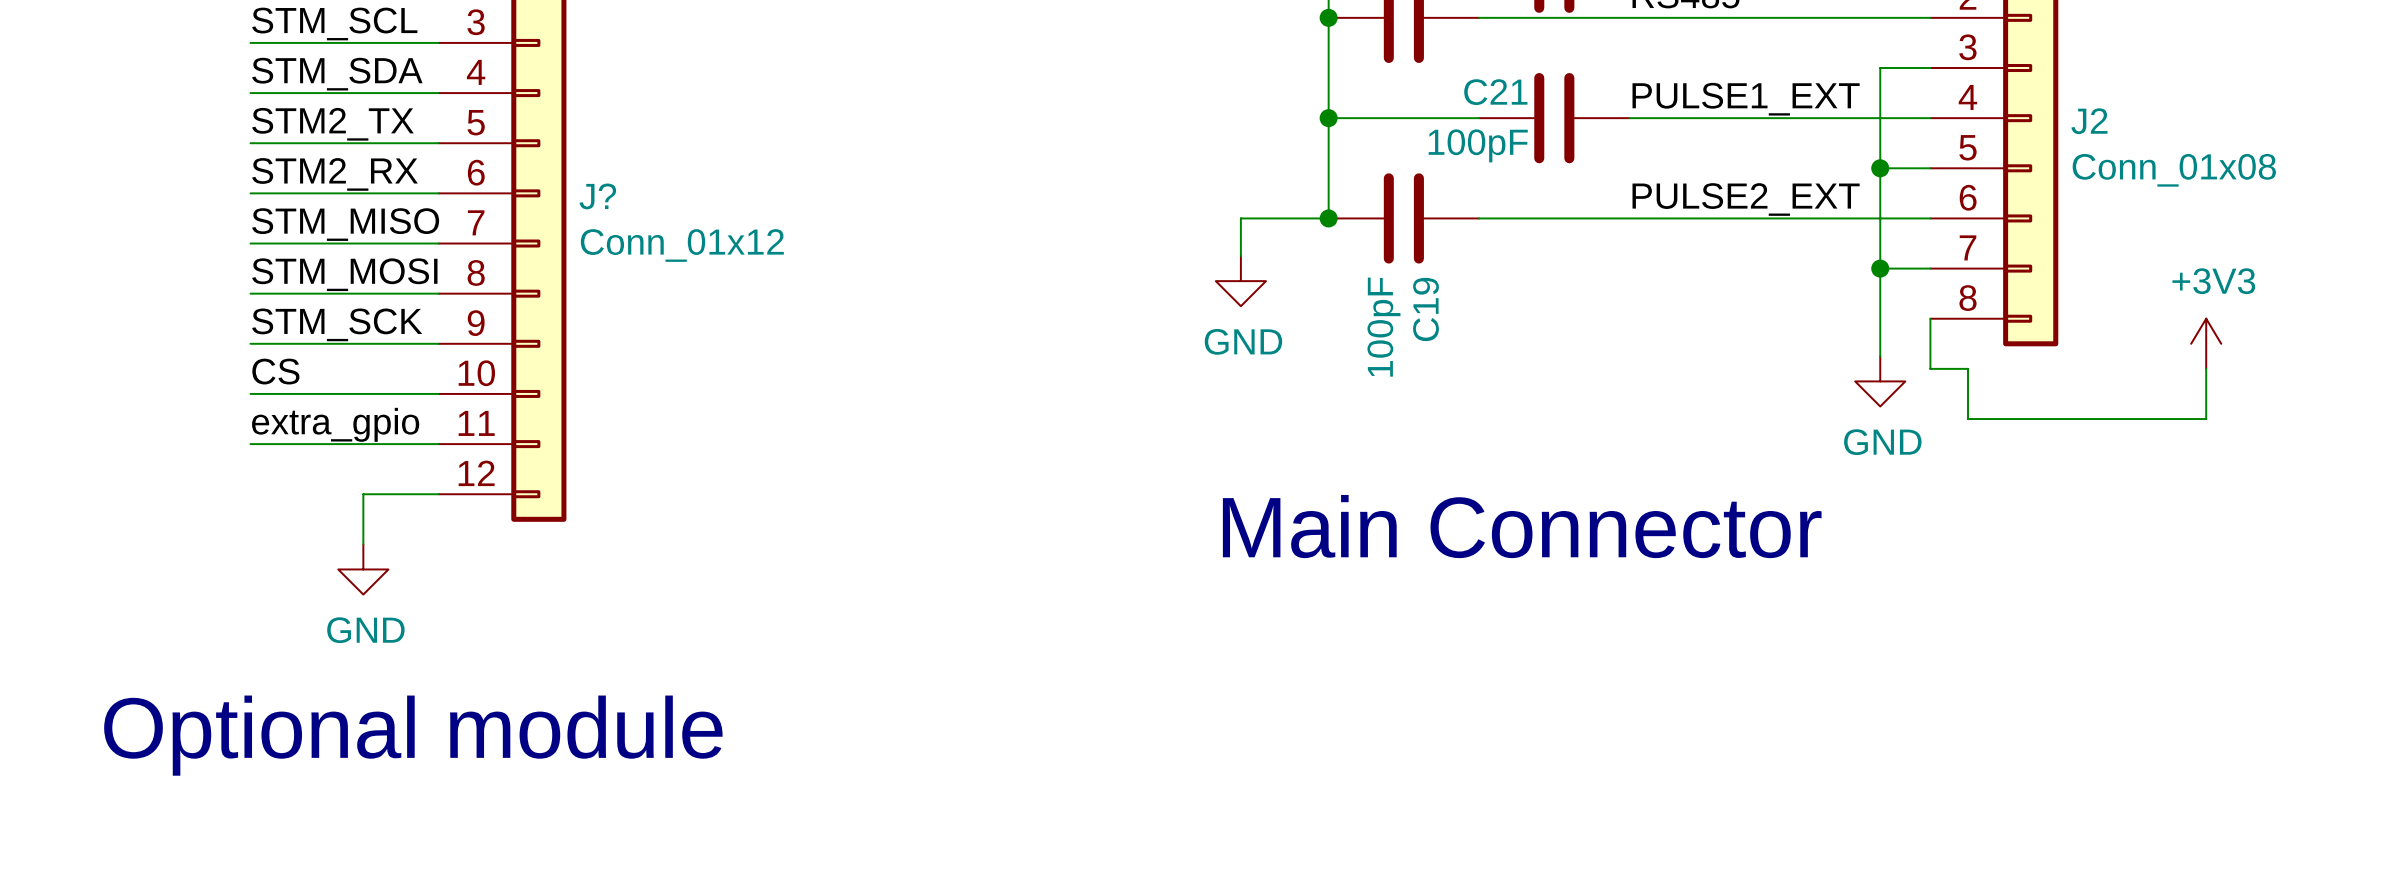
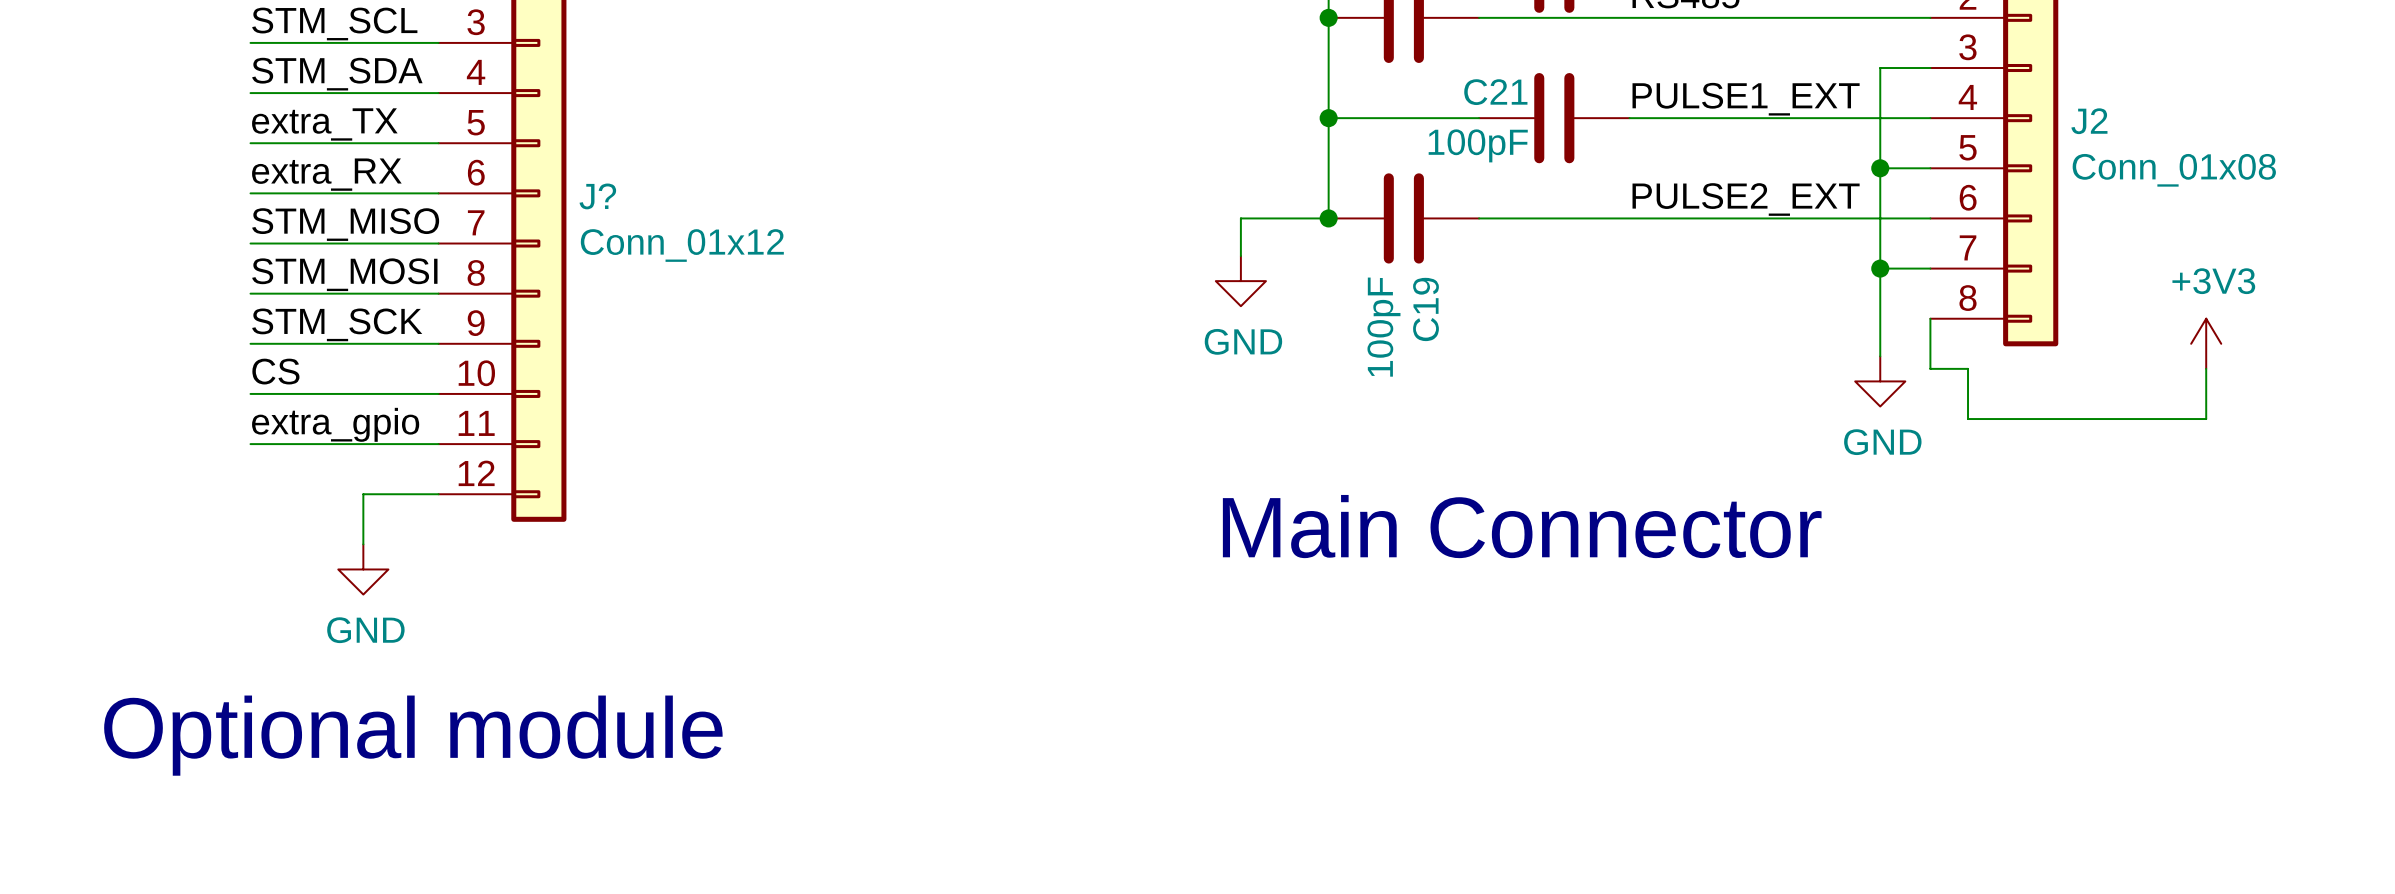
label: STM2_TX (332, 124) -> extra_TX (324, 124)
label: STM2_RX (335, 174) -> extra_RX (326, 174)

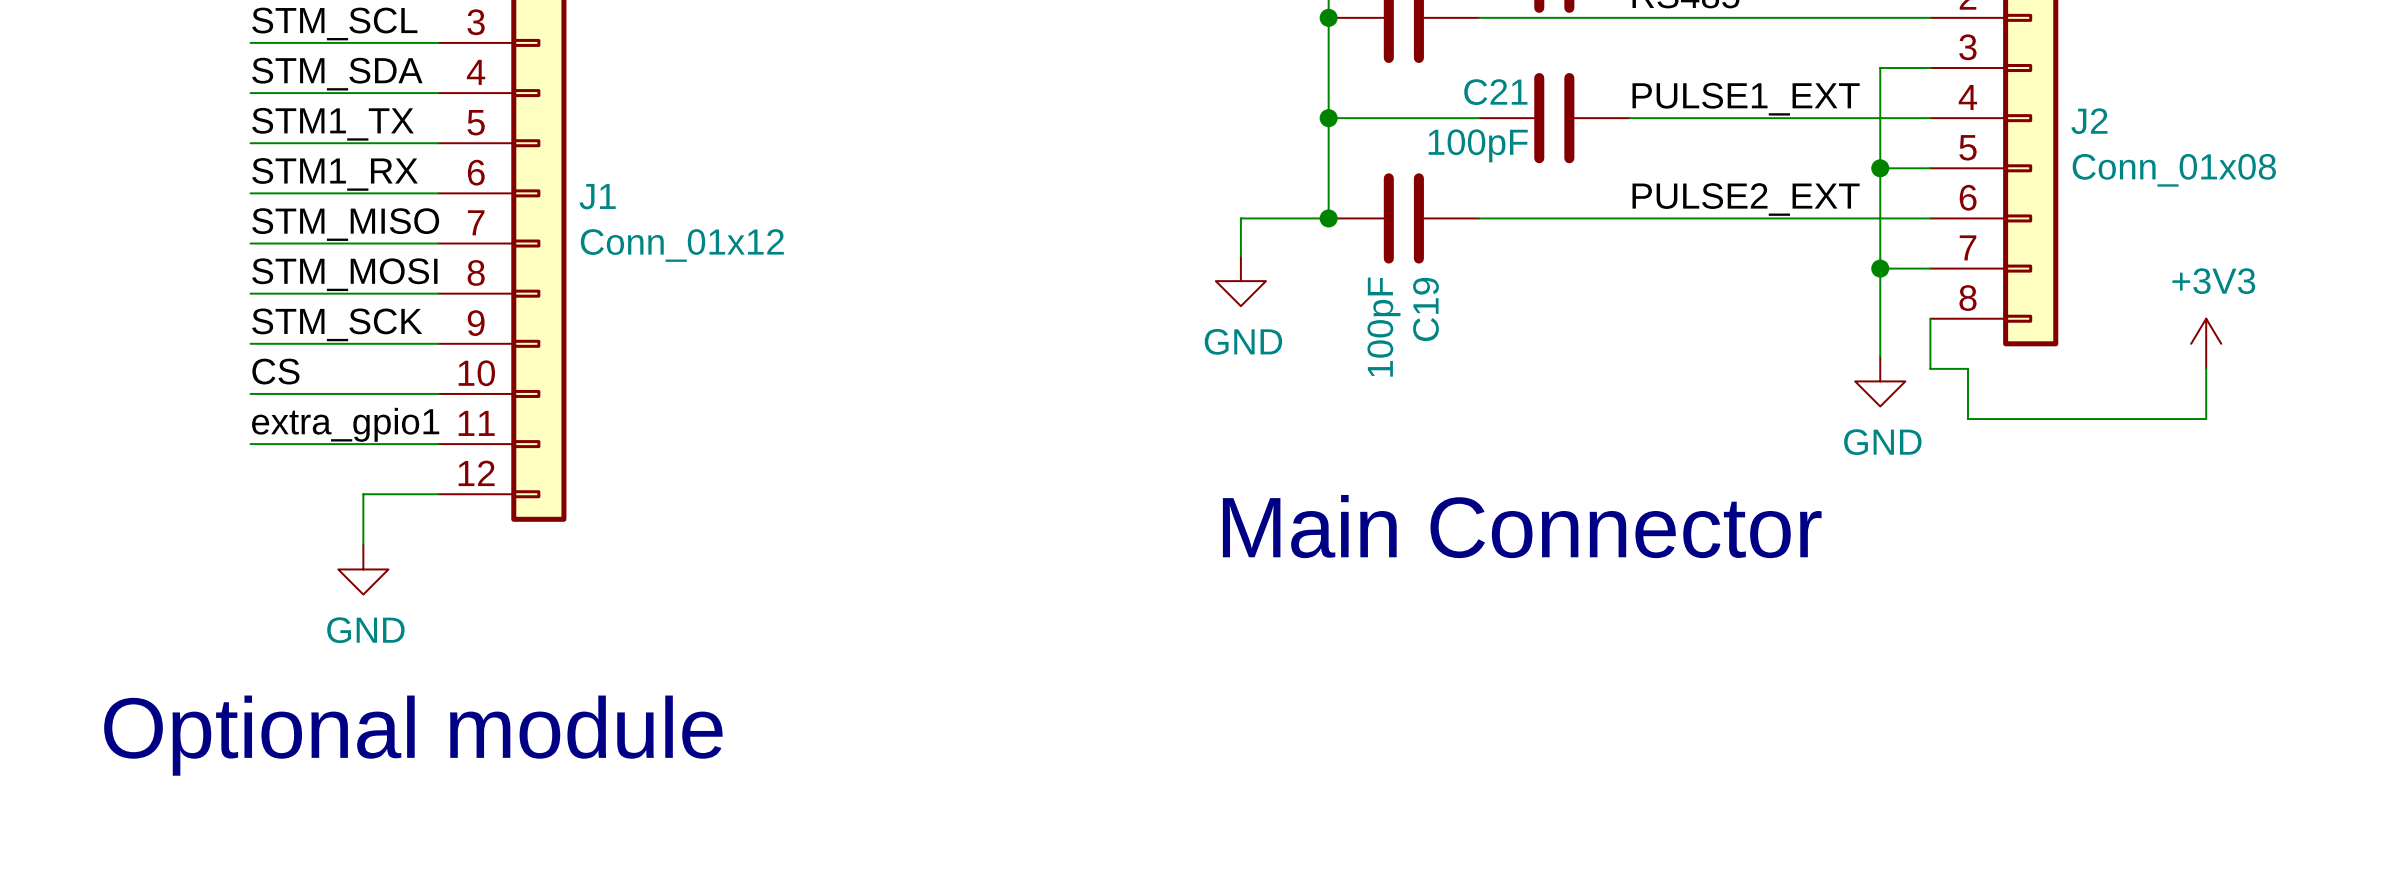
label: extra_TX (324, 124) -> STM1_TX (332, 124)
label: extra_RX (326, 174) -> STM1_RX (335, 174)
J? name: J? (597, 196) -> J1 (597, 196)
label: extra_gpio (335, 424) -> extra_gpio1 (345, 424)

